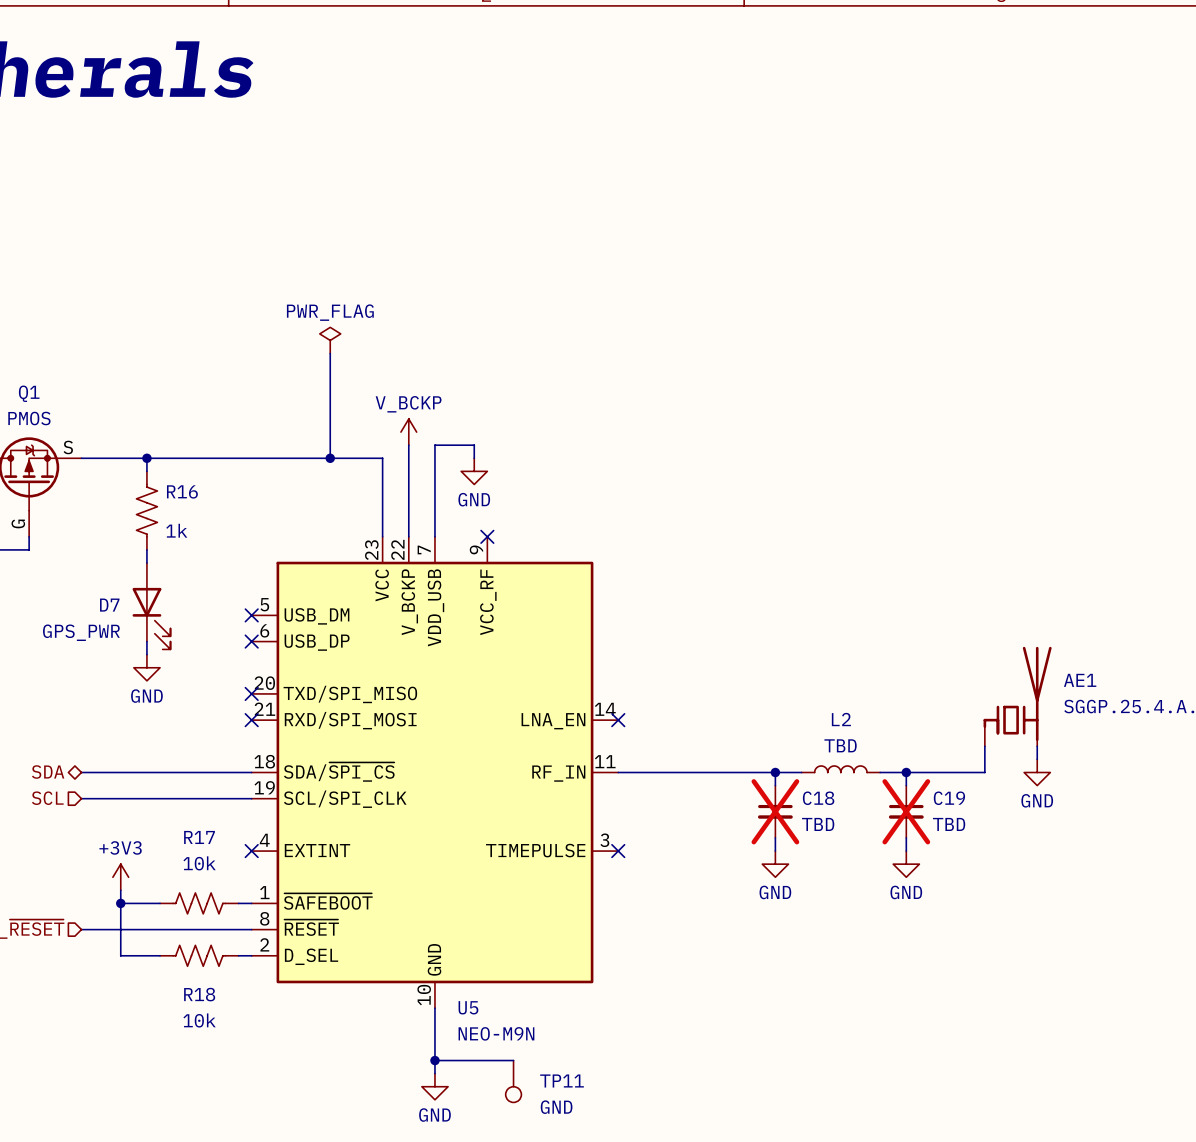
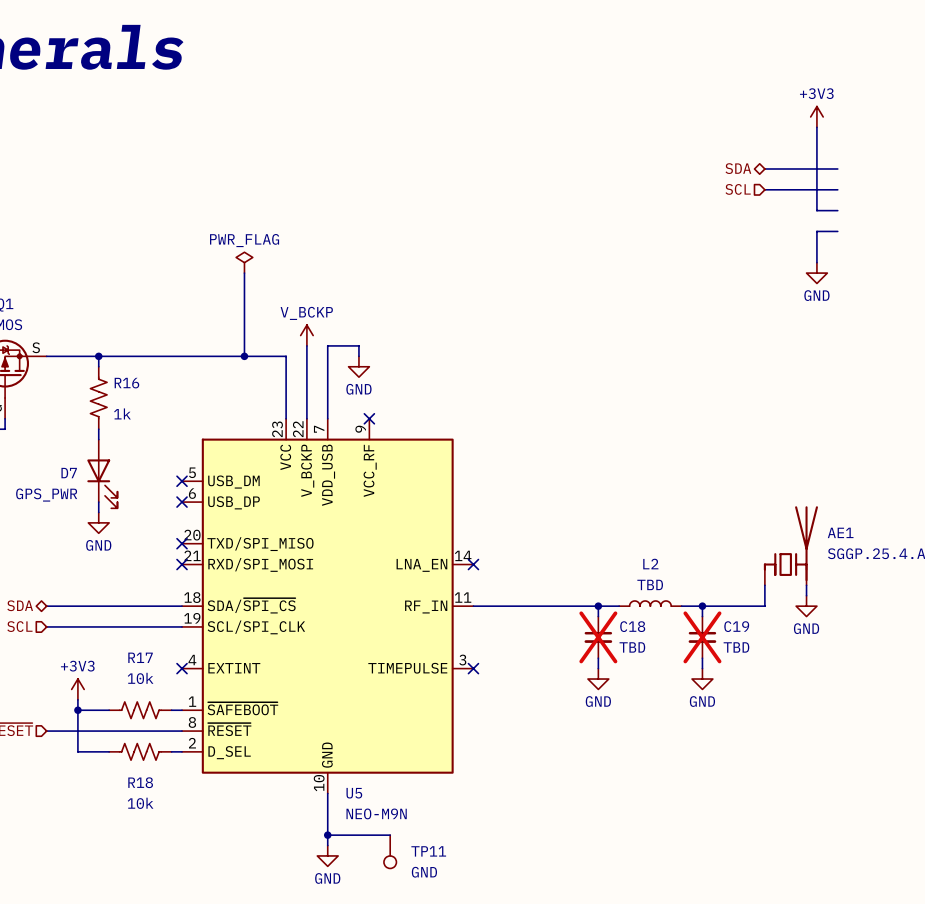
power symbol: none -> +3V3 (816, 116)
wire: none -> (816, 127) (816, 210) (837, 210)
hierarchical label: none -> SDA (738, 168)
wire: none -> (764, 168) (837, 168)
hierarchical label: none -> SCL (738, 189)
wire: none -> (764, 189) (837, 189)
wire: none -> (837, 231) (816, 231) (816, 262)
power symbol: none -> GND (816, 273)

